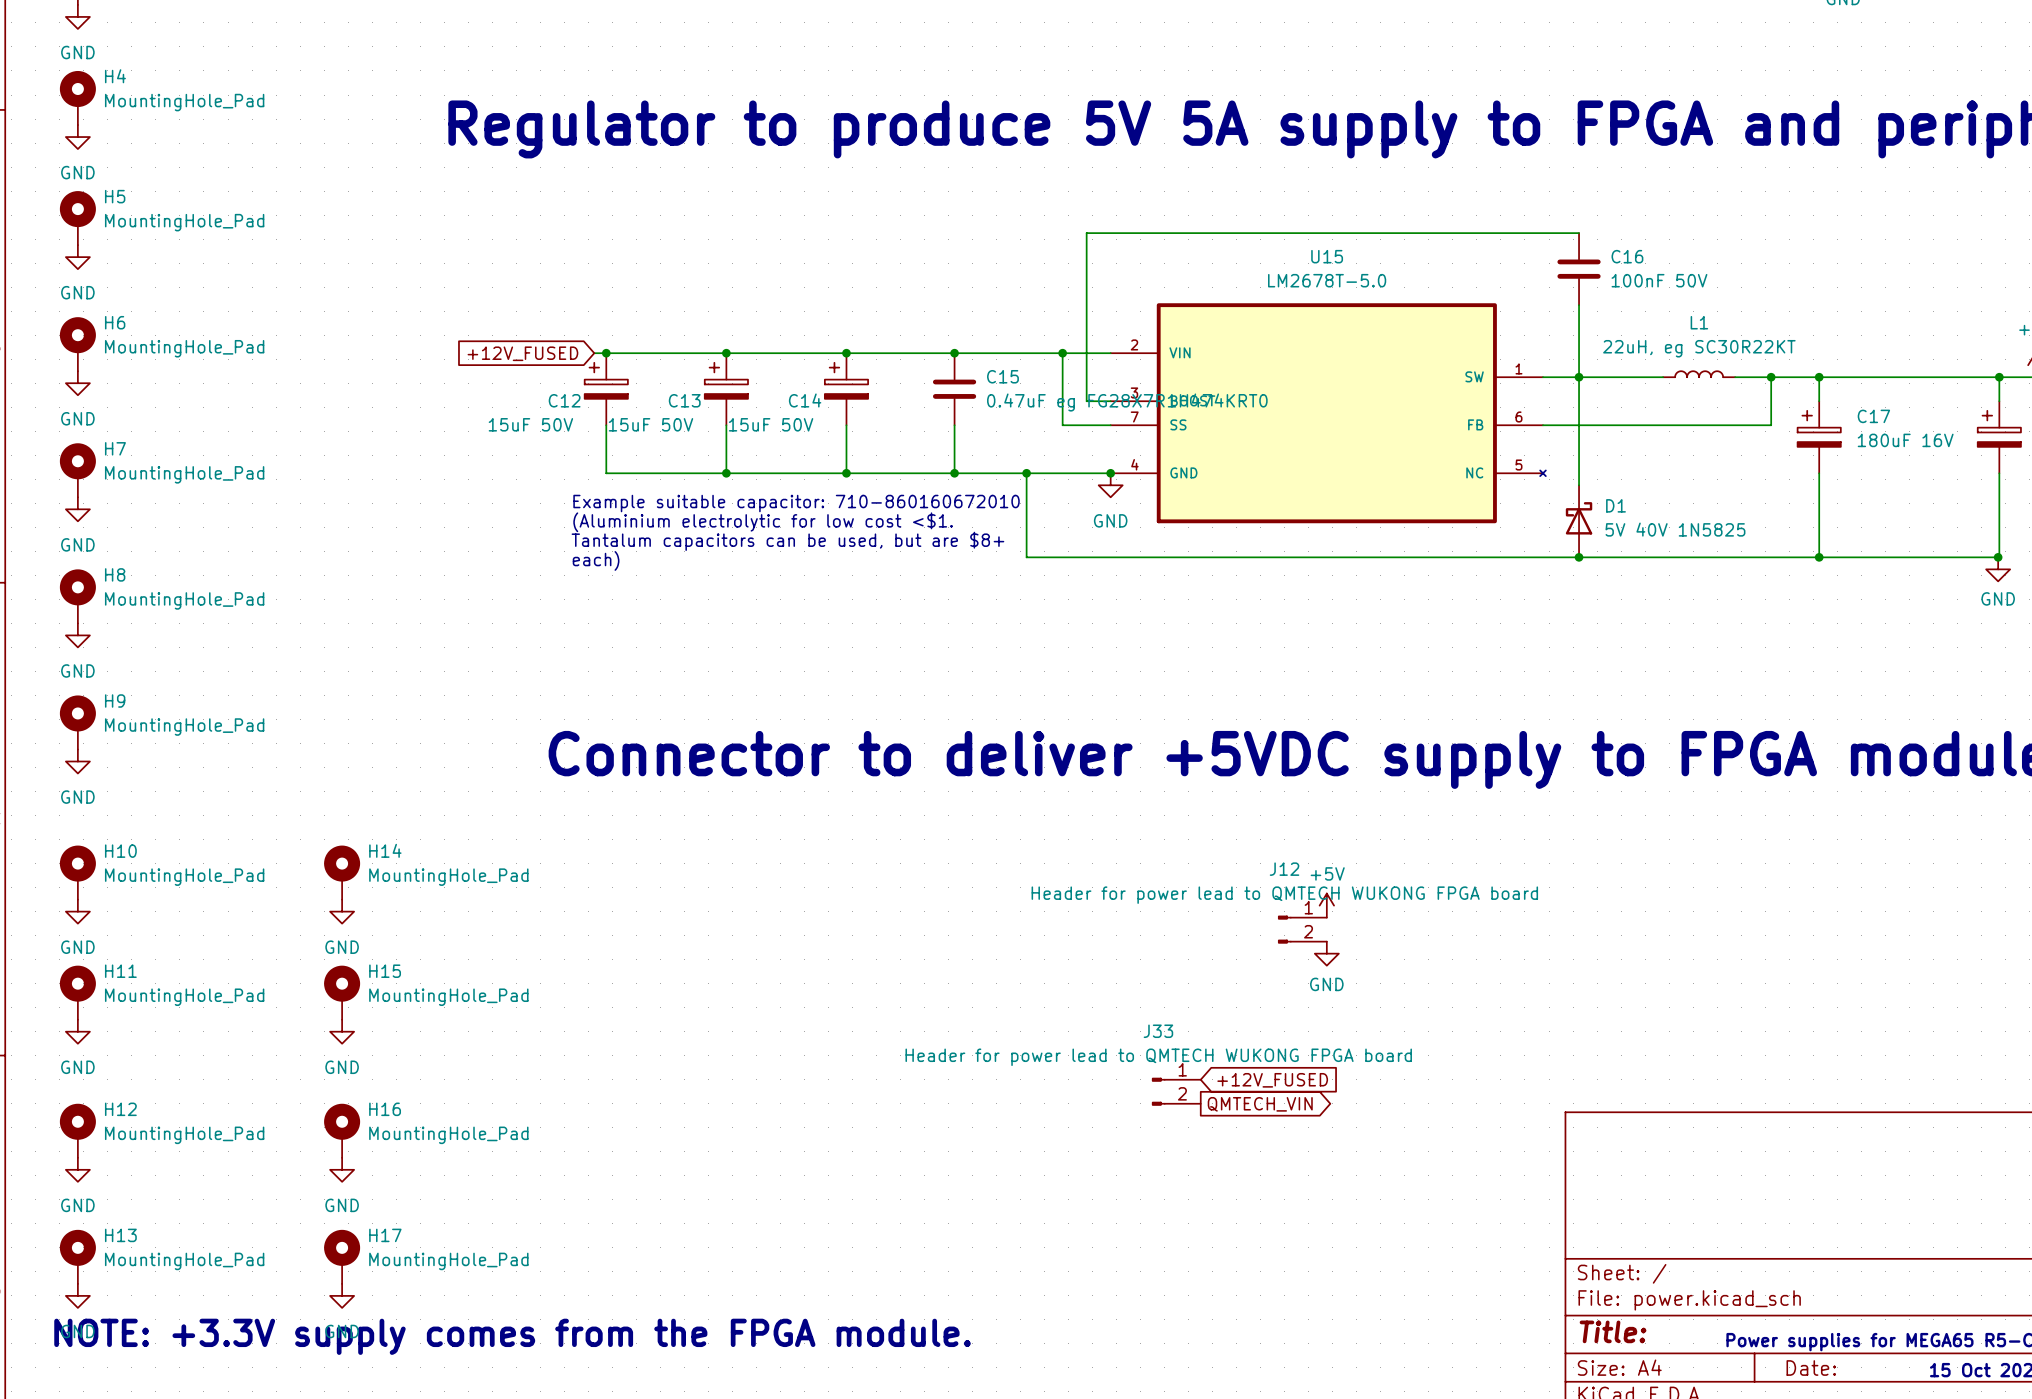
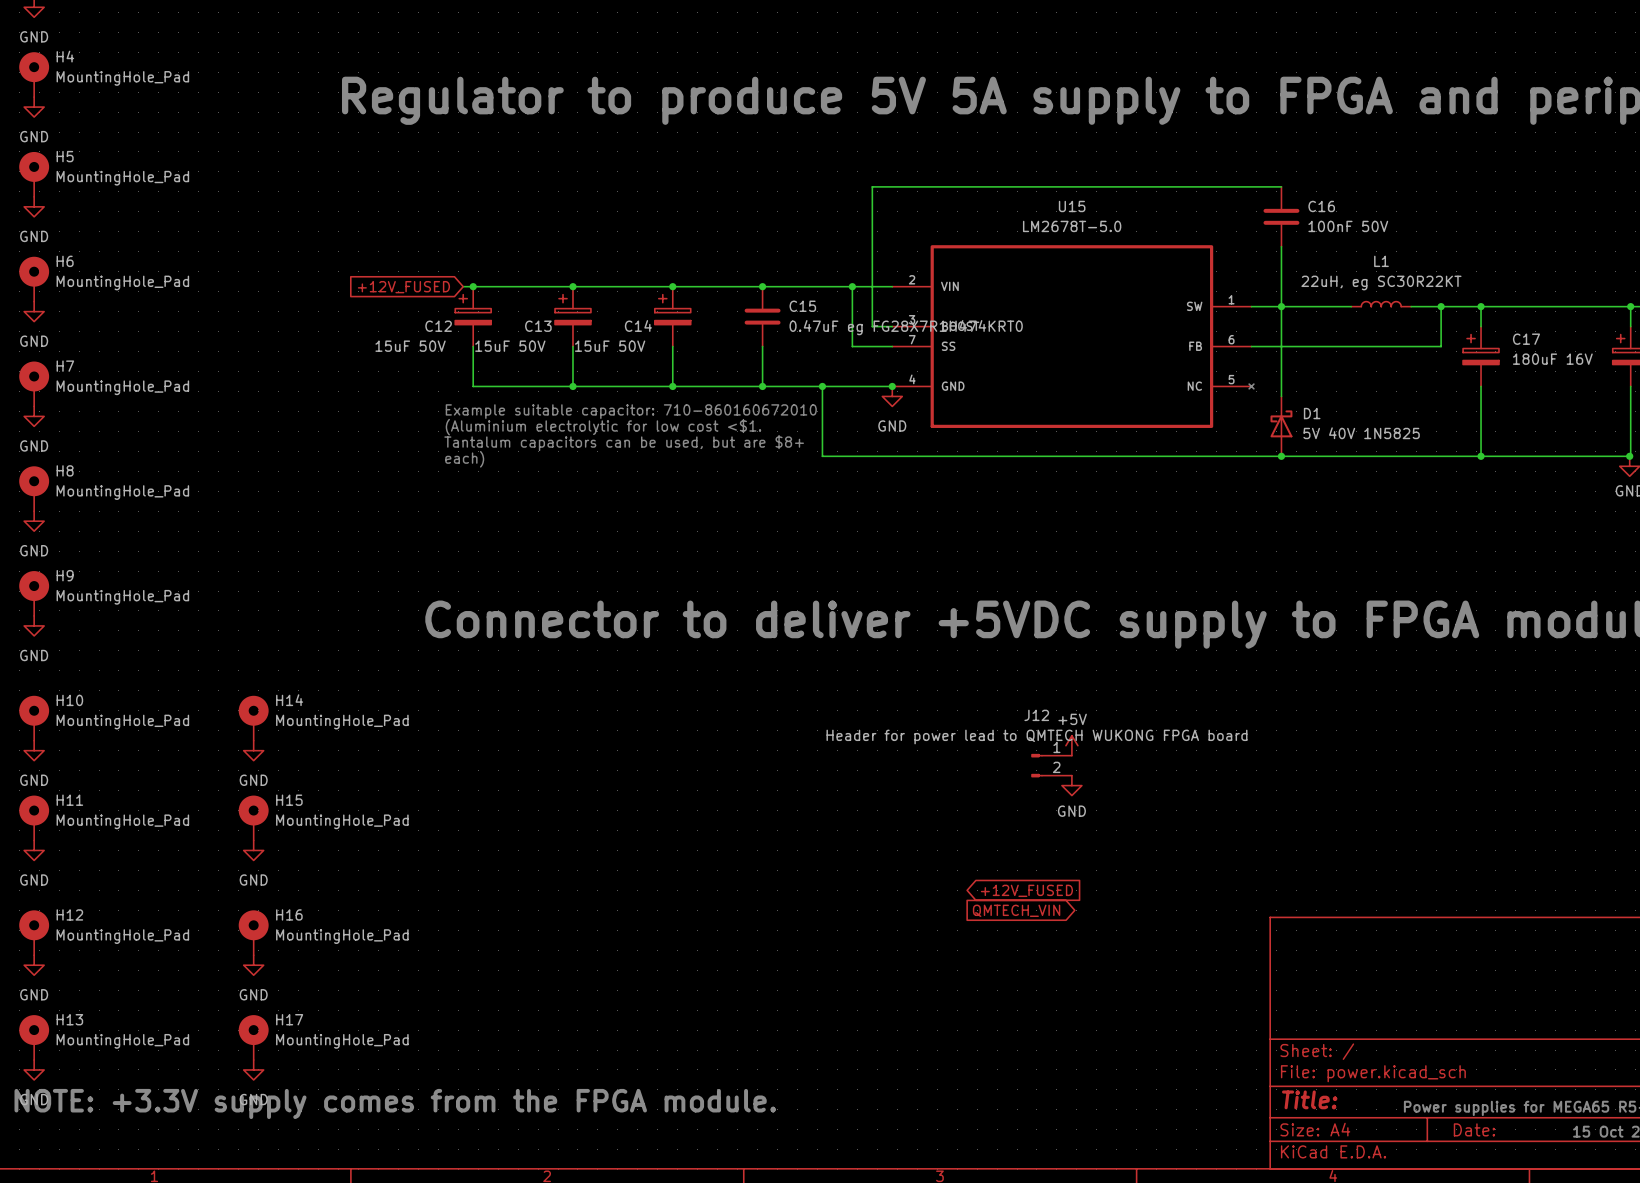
J33: Header for power lead to QMTECH WUKONG FPGA board (1176, 1091) -> none

